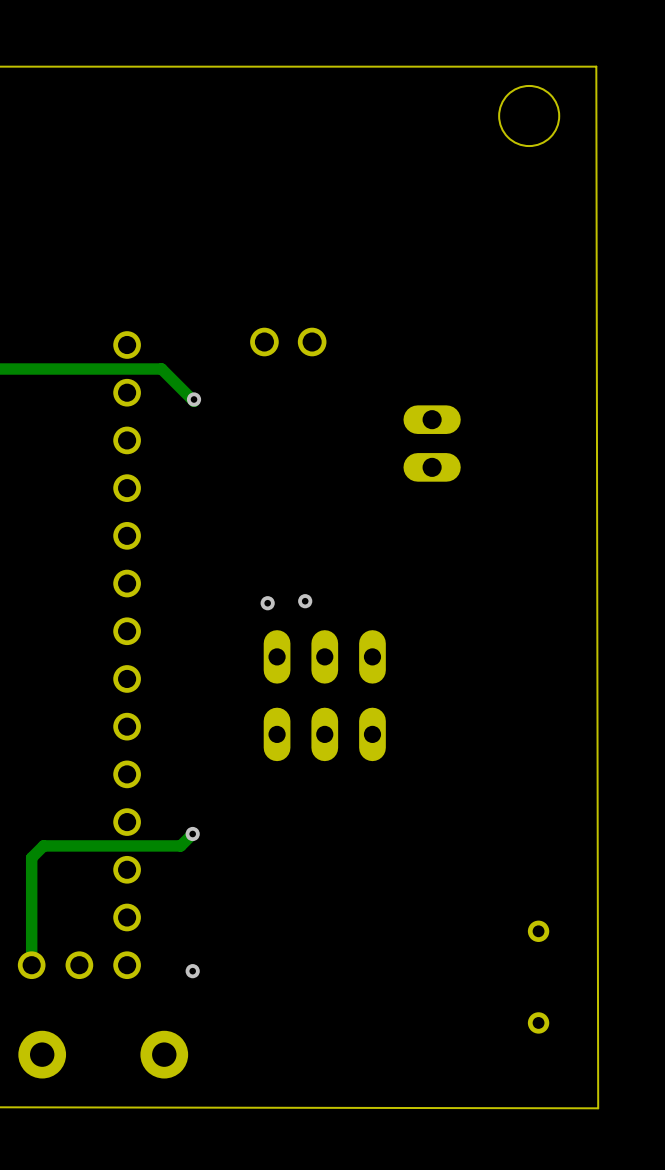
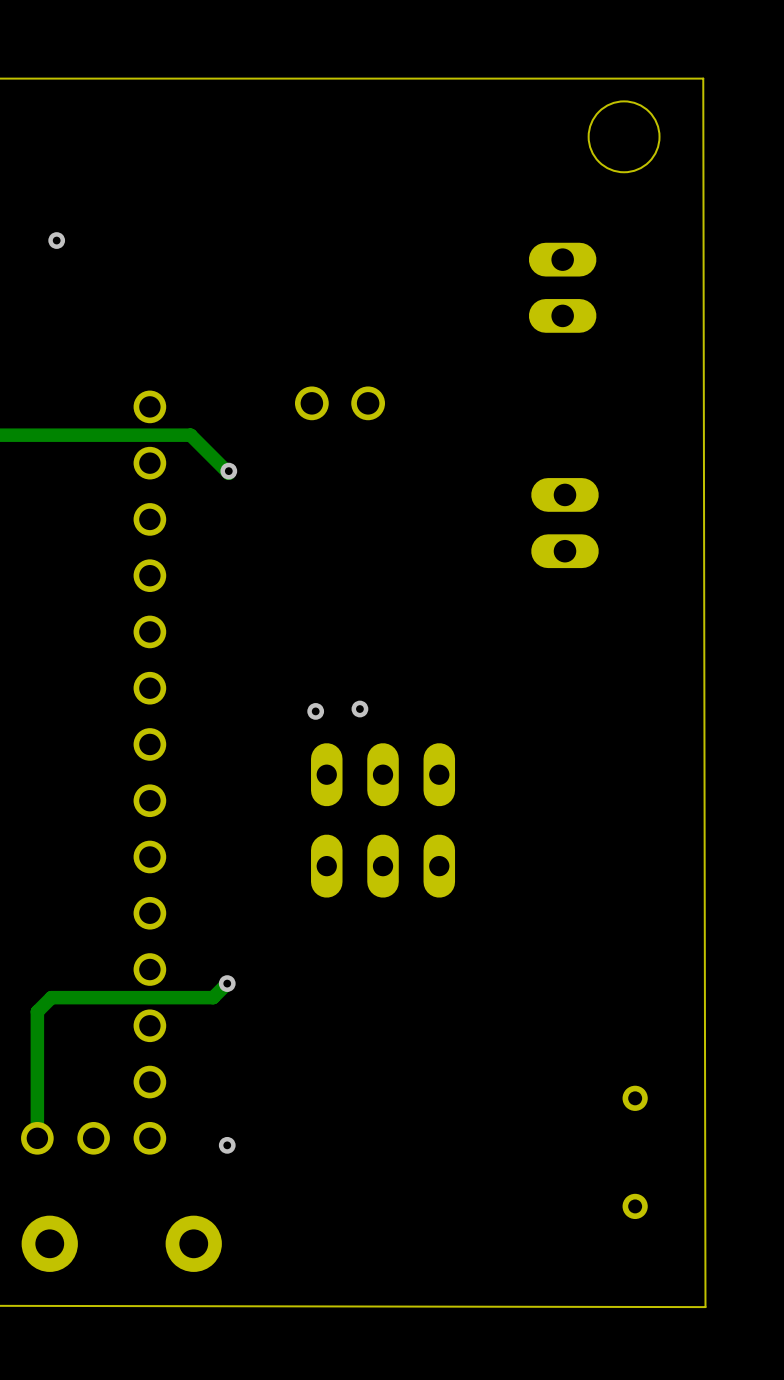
via: none -> (56, 240)
part: none -> (562, 287)
part position: (432, 443) -> (564, 523)

